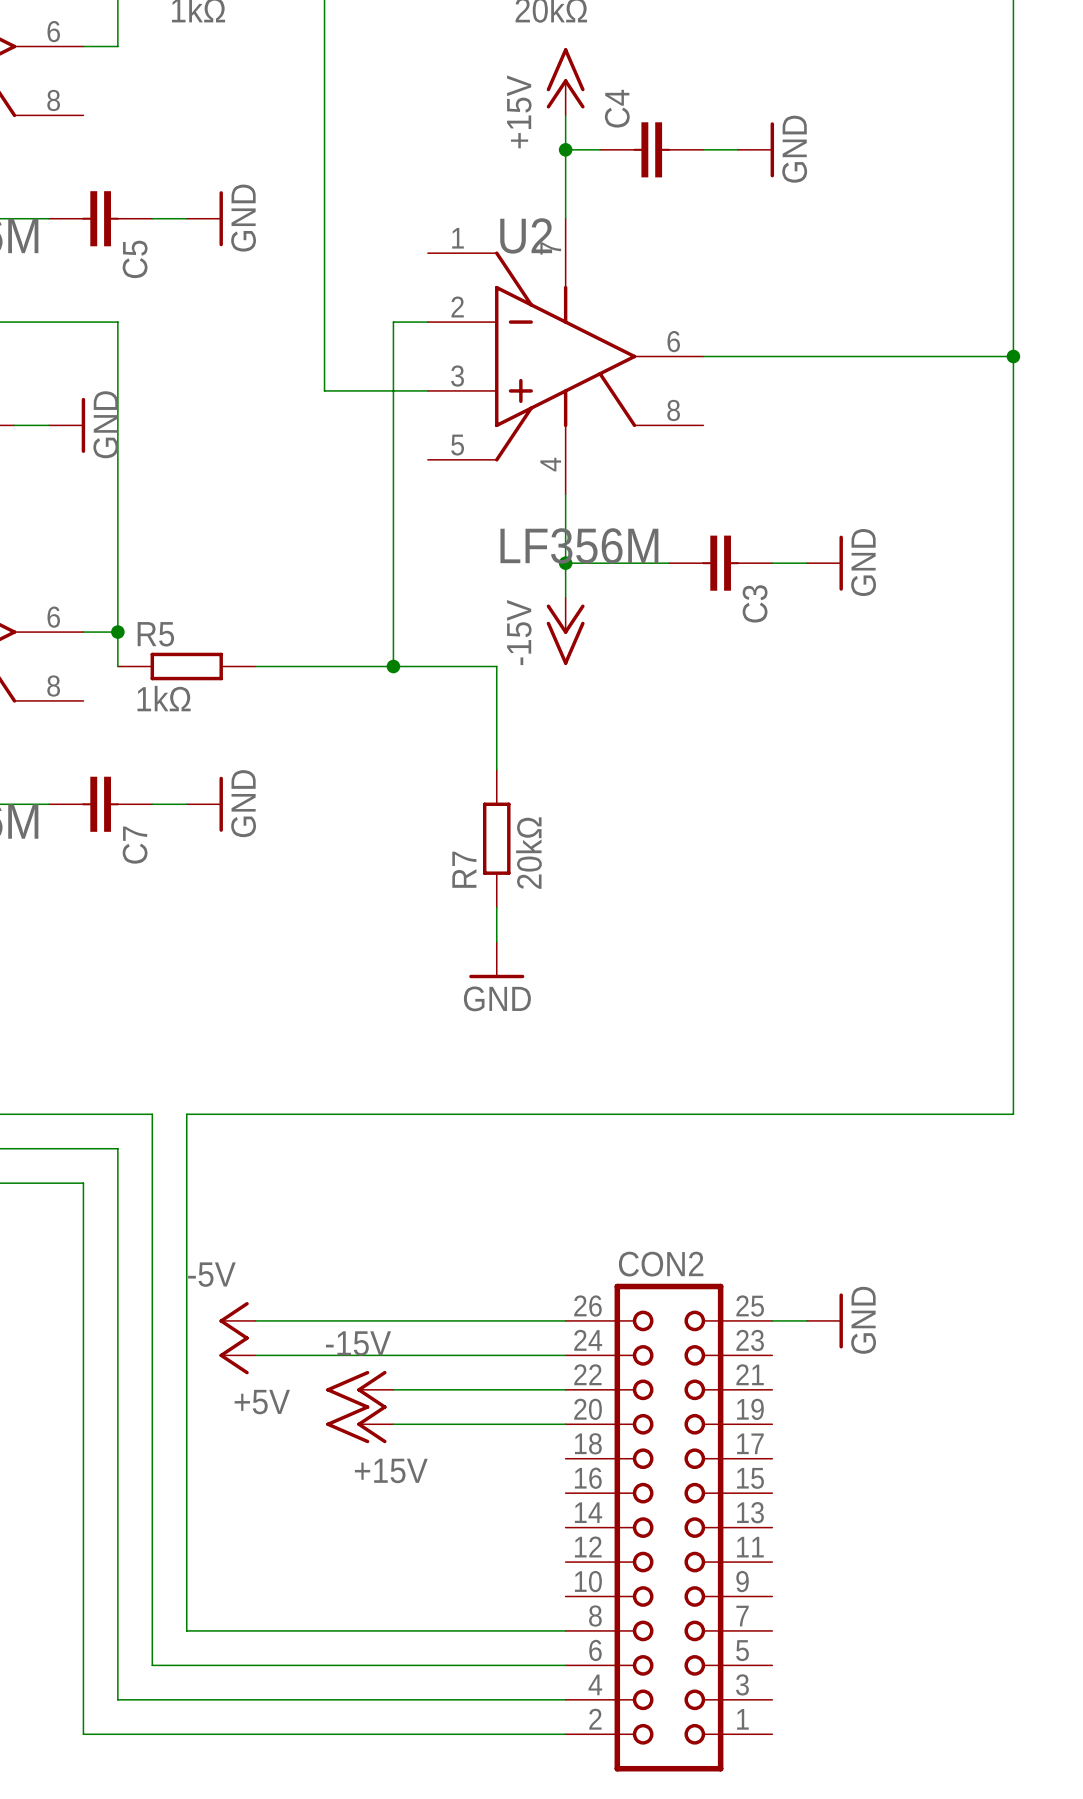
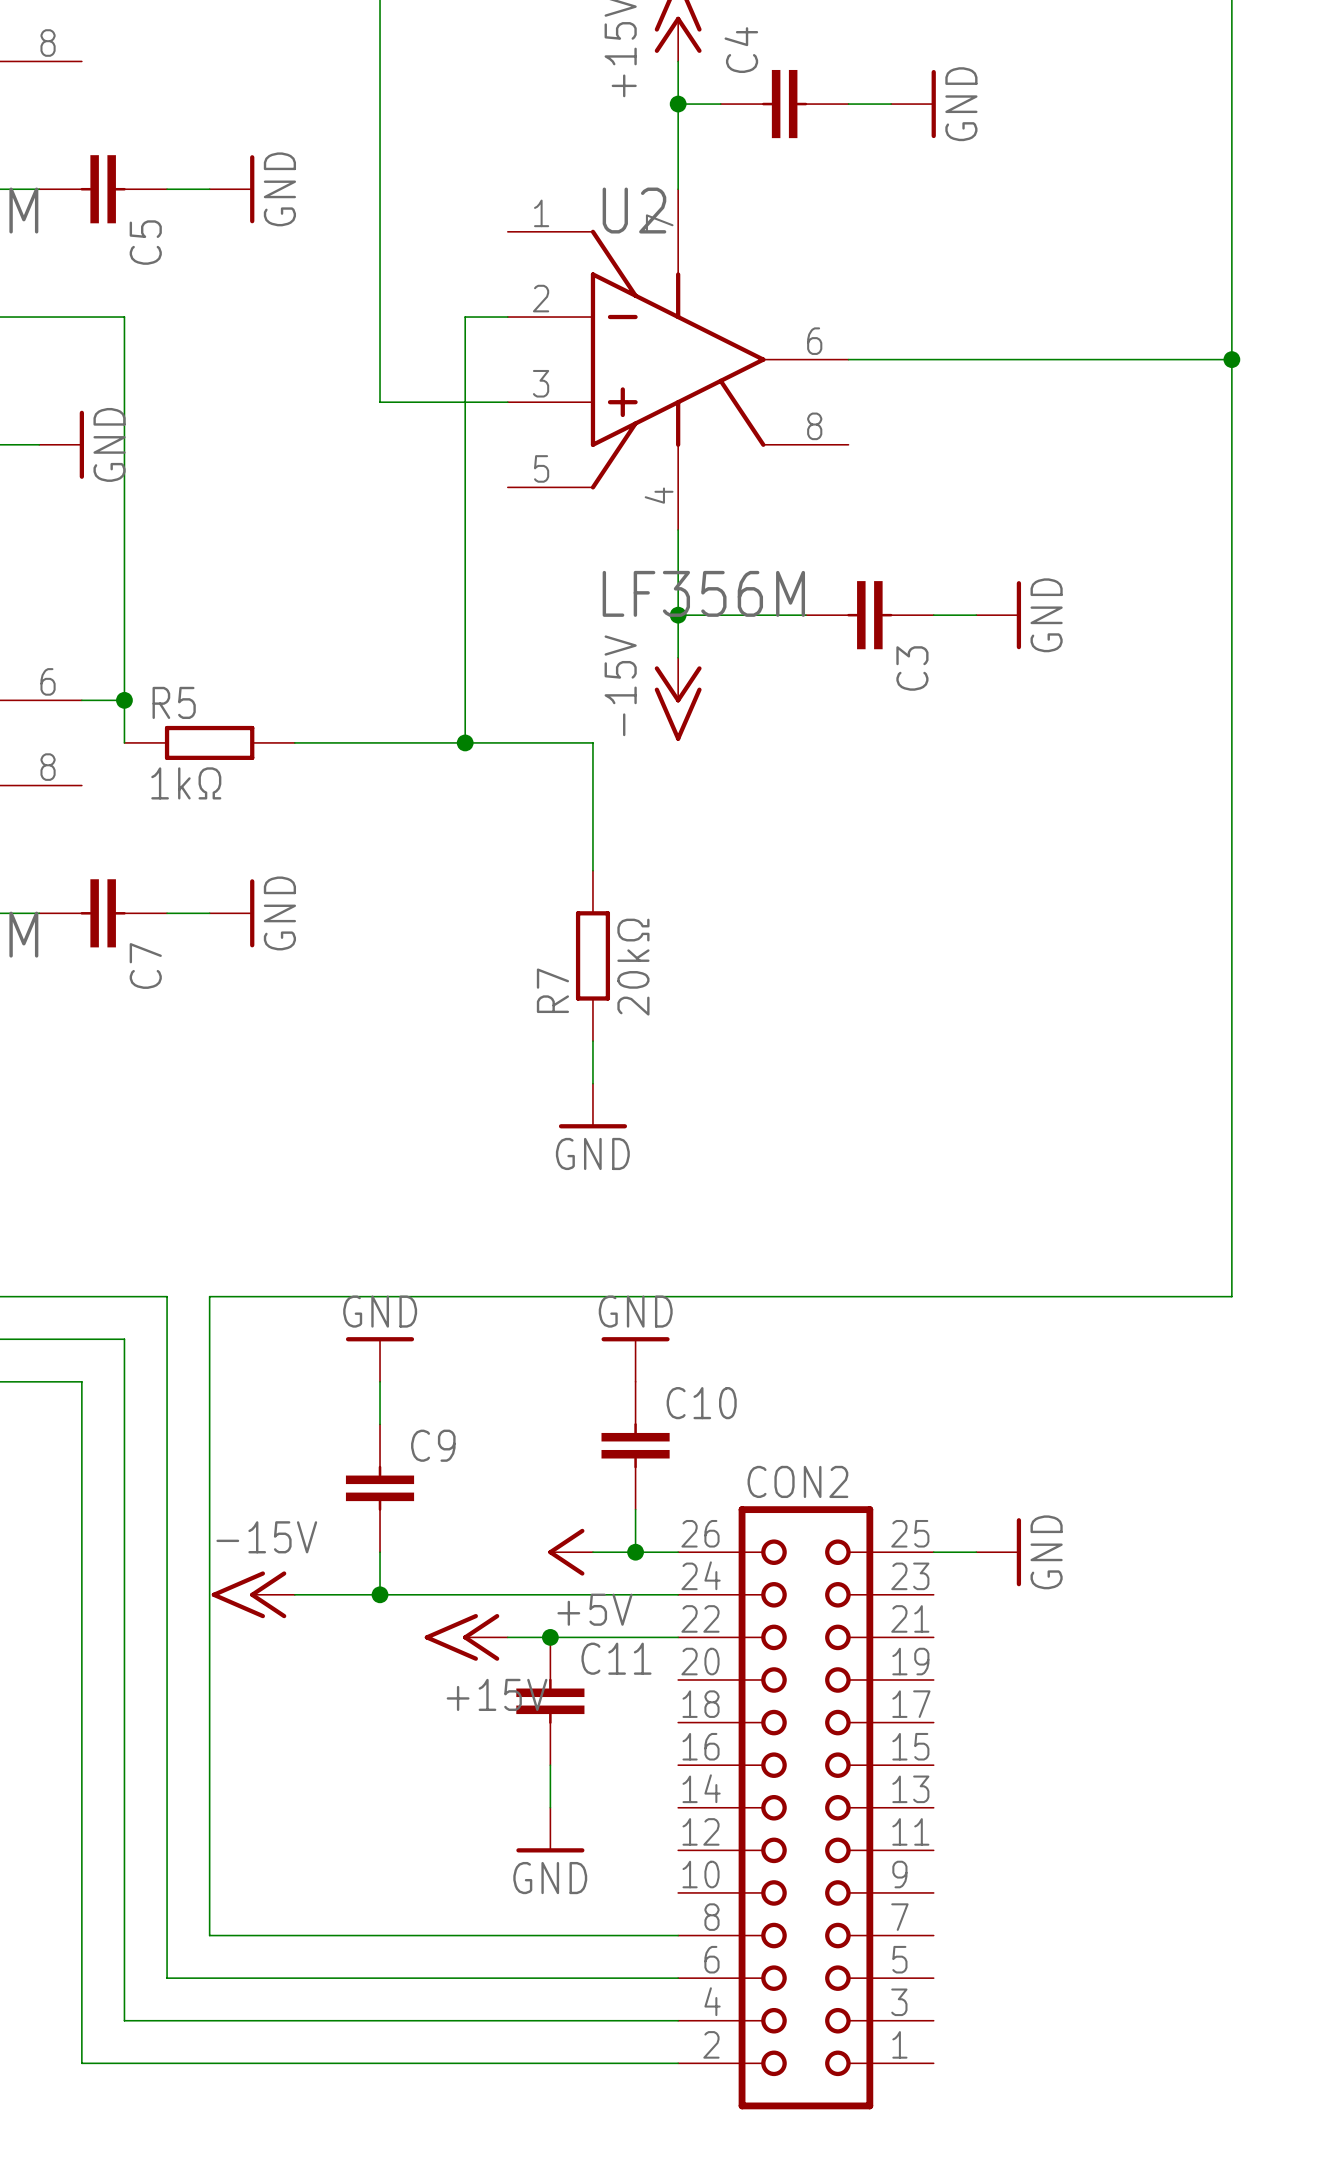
power symbol: none -> GND (380, 1359)
power symbol: none -> GND (635, 1359)
wire: none -> (380, 1381) (380, 1424)
C10: none -> (635, 1445)
C9: none -> (380, 1488)
wire: none -> (635, 1509) (635, 1552)
power symbol: -5V (237, 1320) -> none
wire: (255, 1320) (496, 1320) -> none
wire: none -> (380, 1552) (380, 1594)
junction: none -> (635, 1552)
power symbol position: +5V (237, 1355) -> +5V (570, 1552)
junction: none -> (380, 1594)
power symbol position: -15V (359, 1389) -> -15V (253, 1594)
junction: none -> (550, 1637)
power symbol position: +15V (359, 1424) -> +15V (466, 1637)
wire: (393, 1424) (565, 1424) -> none
C11: none -> (550, 1701)
wire: none -> (550, 1765) (550, 1807)
power symbol: none -> GND (550, 1830)

